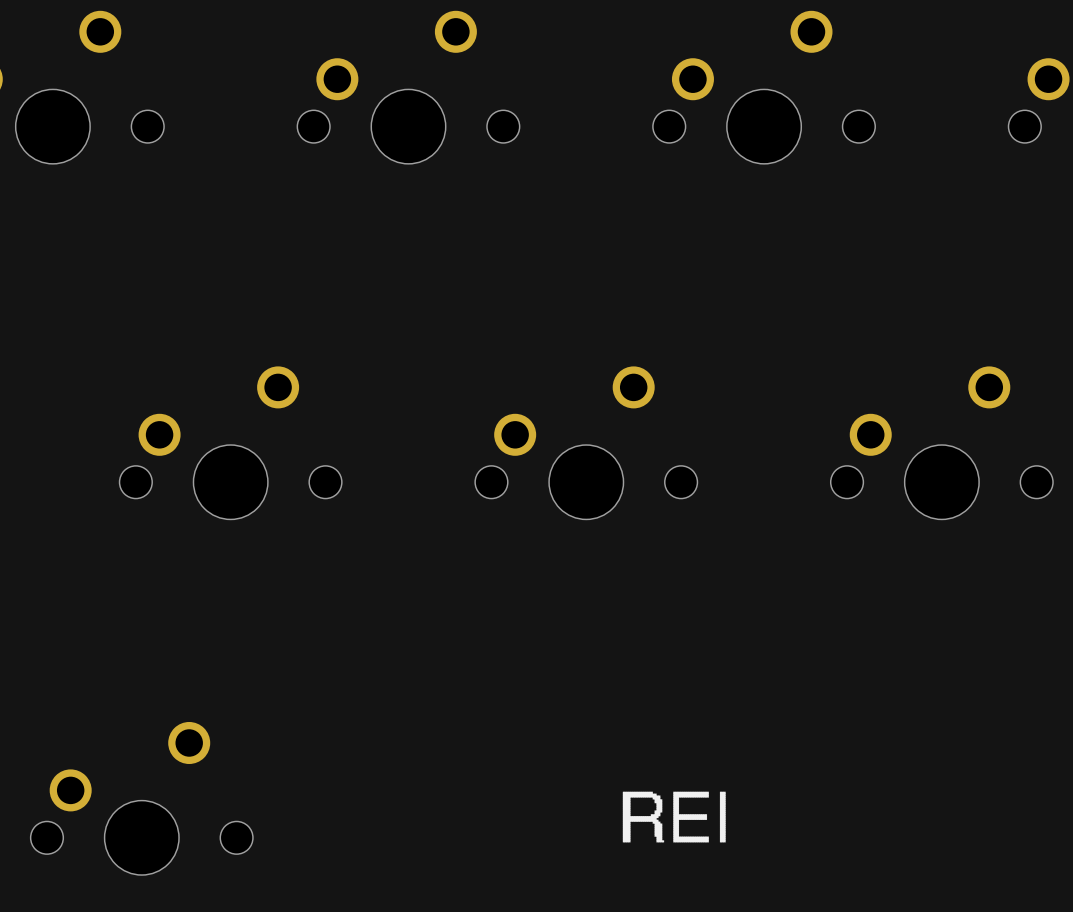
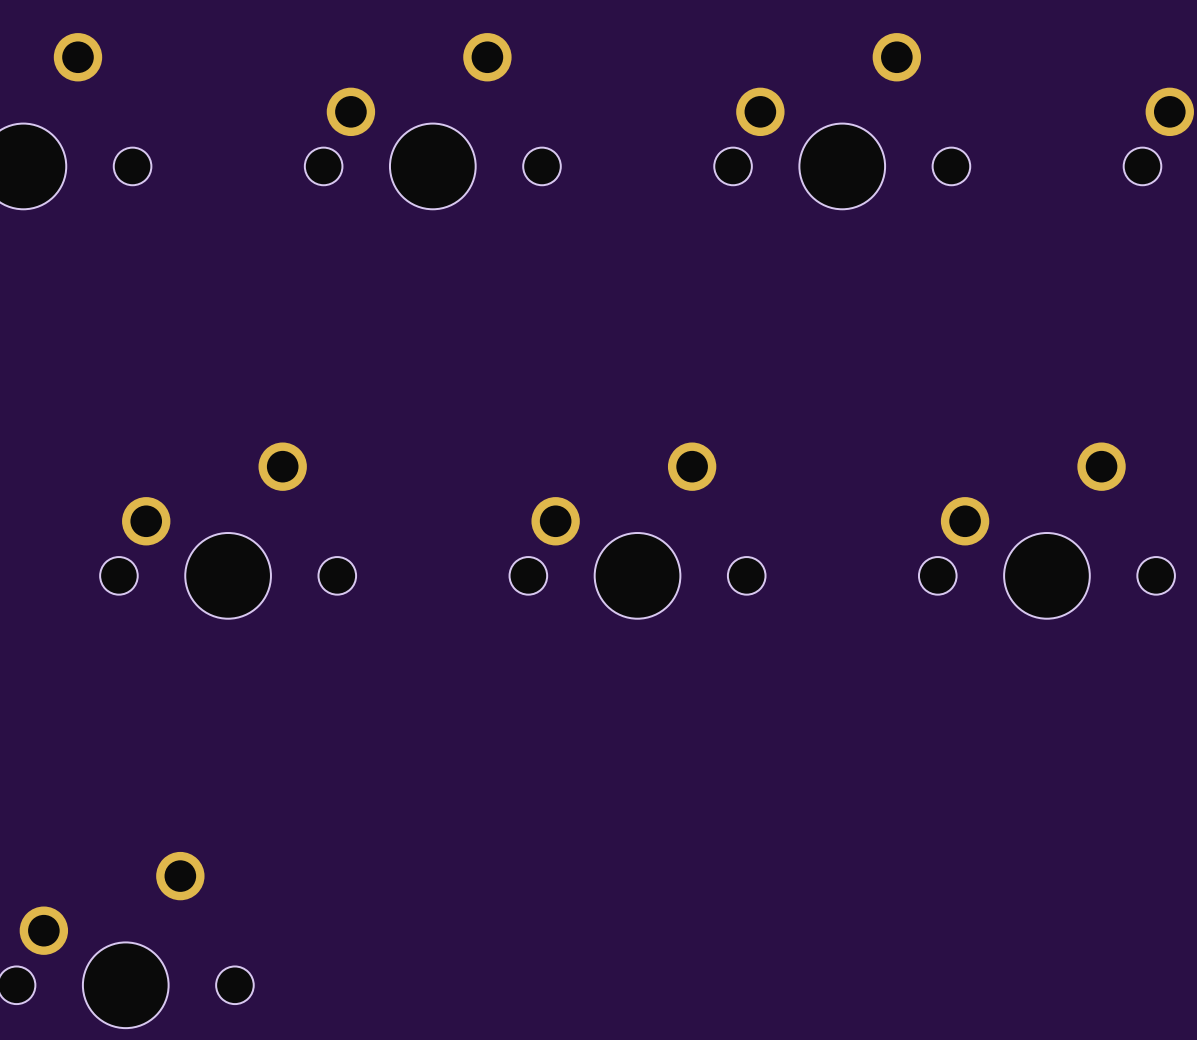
drawing: [622, 791, 726, 843] -> none

